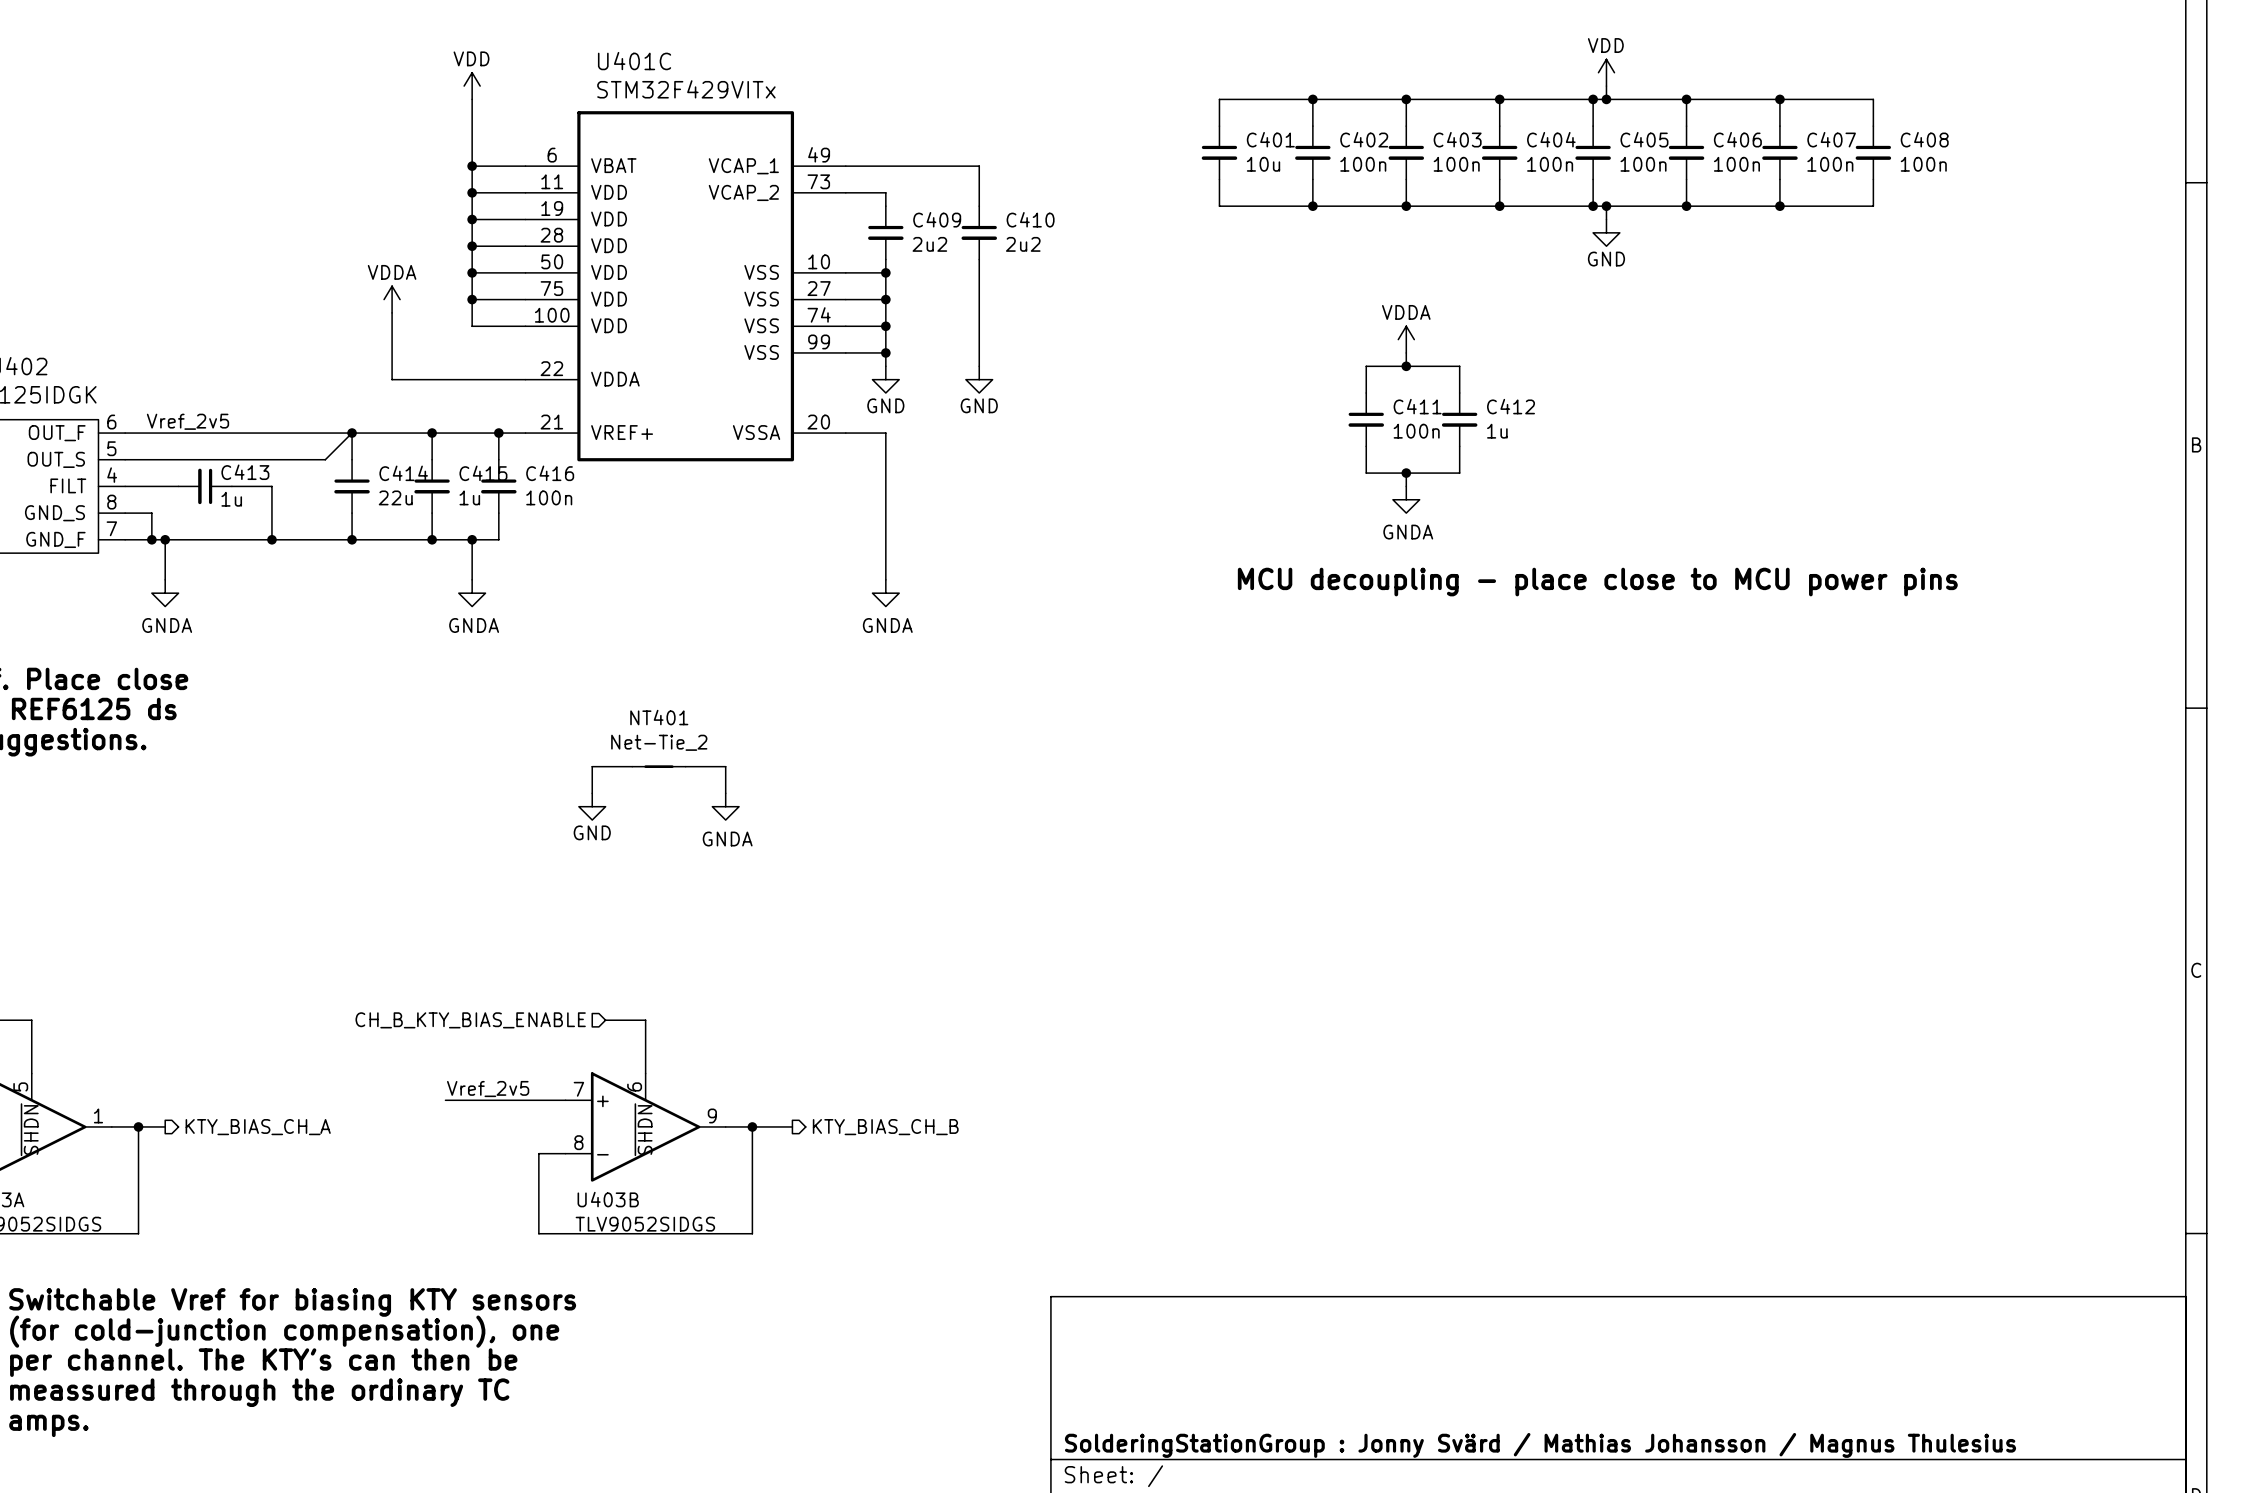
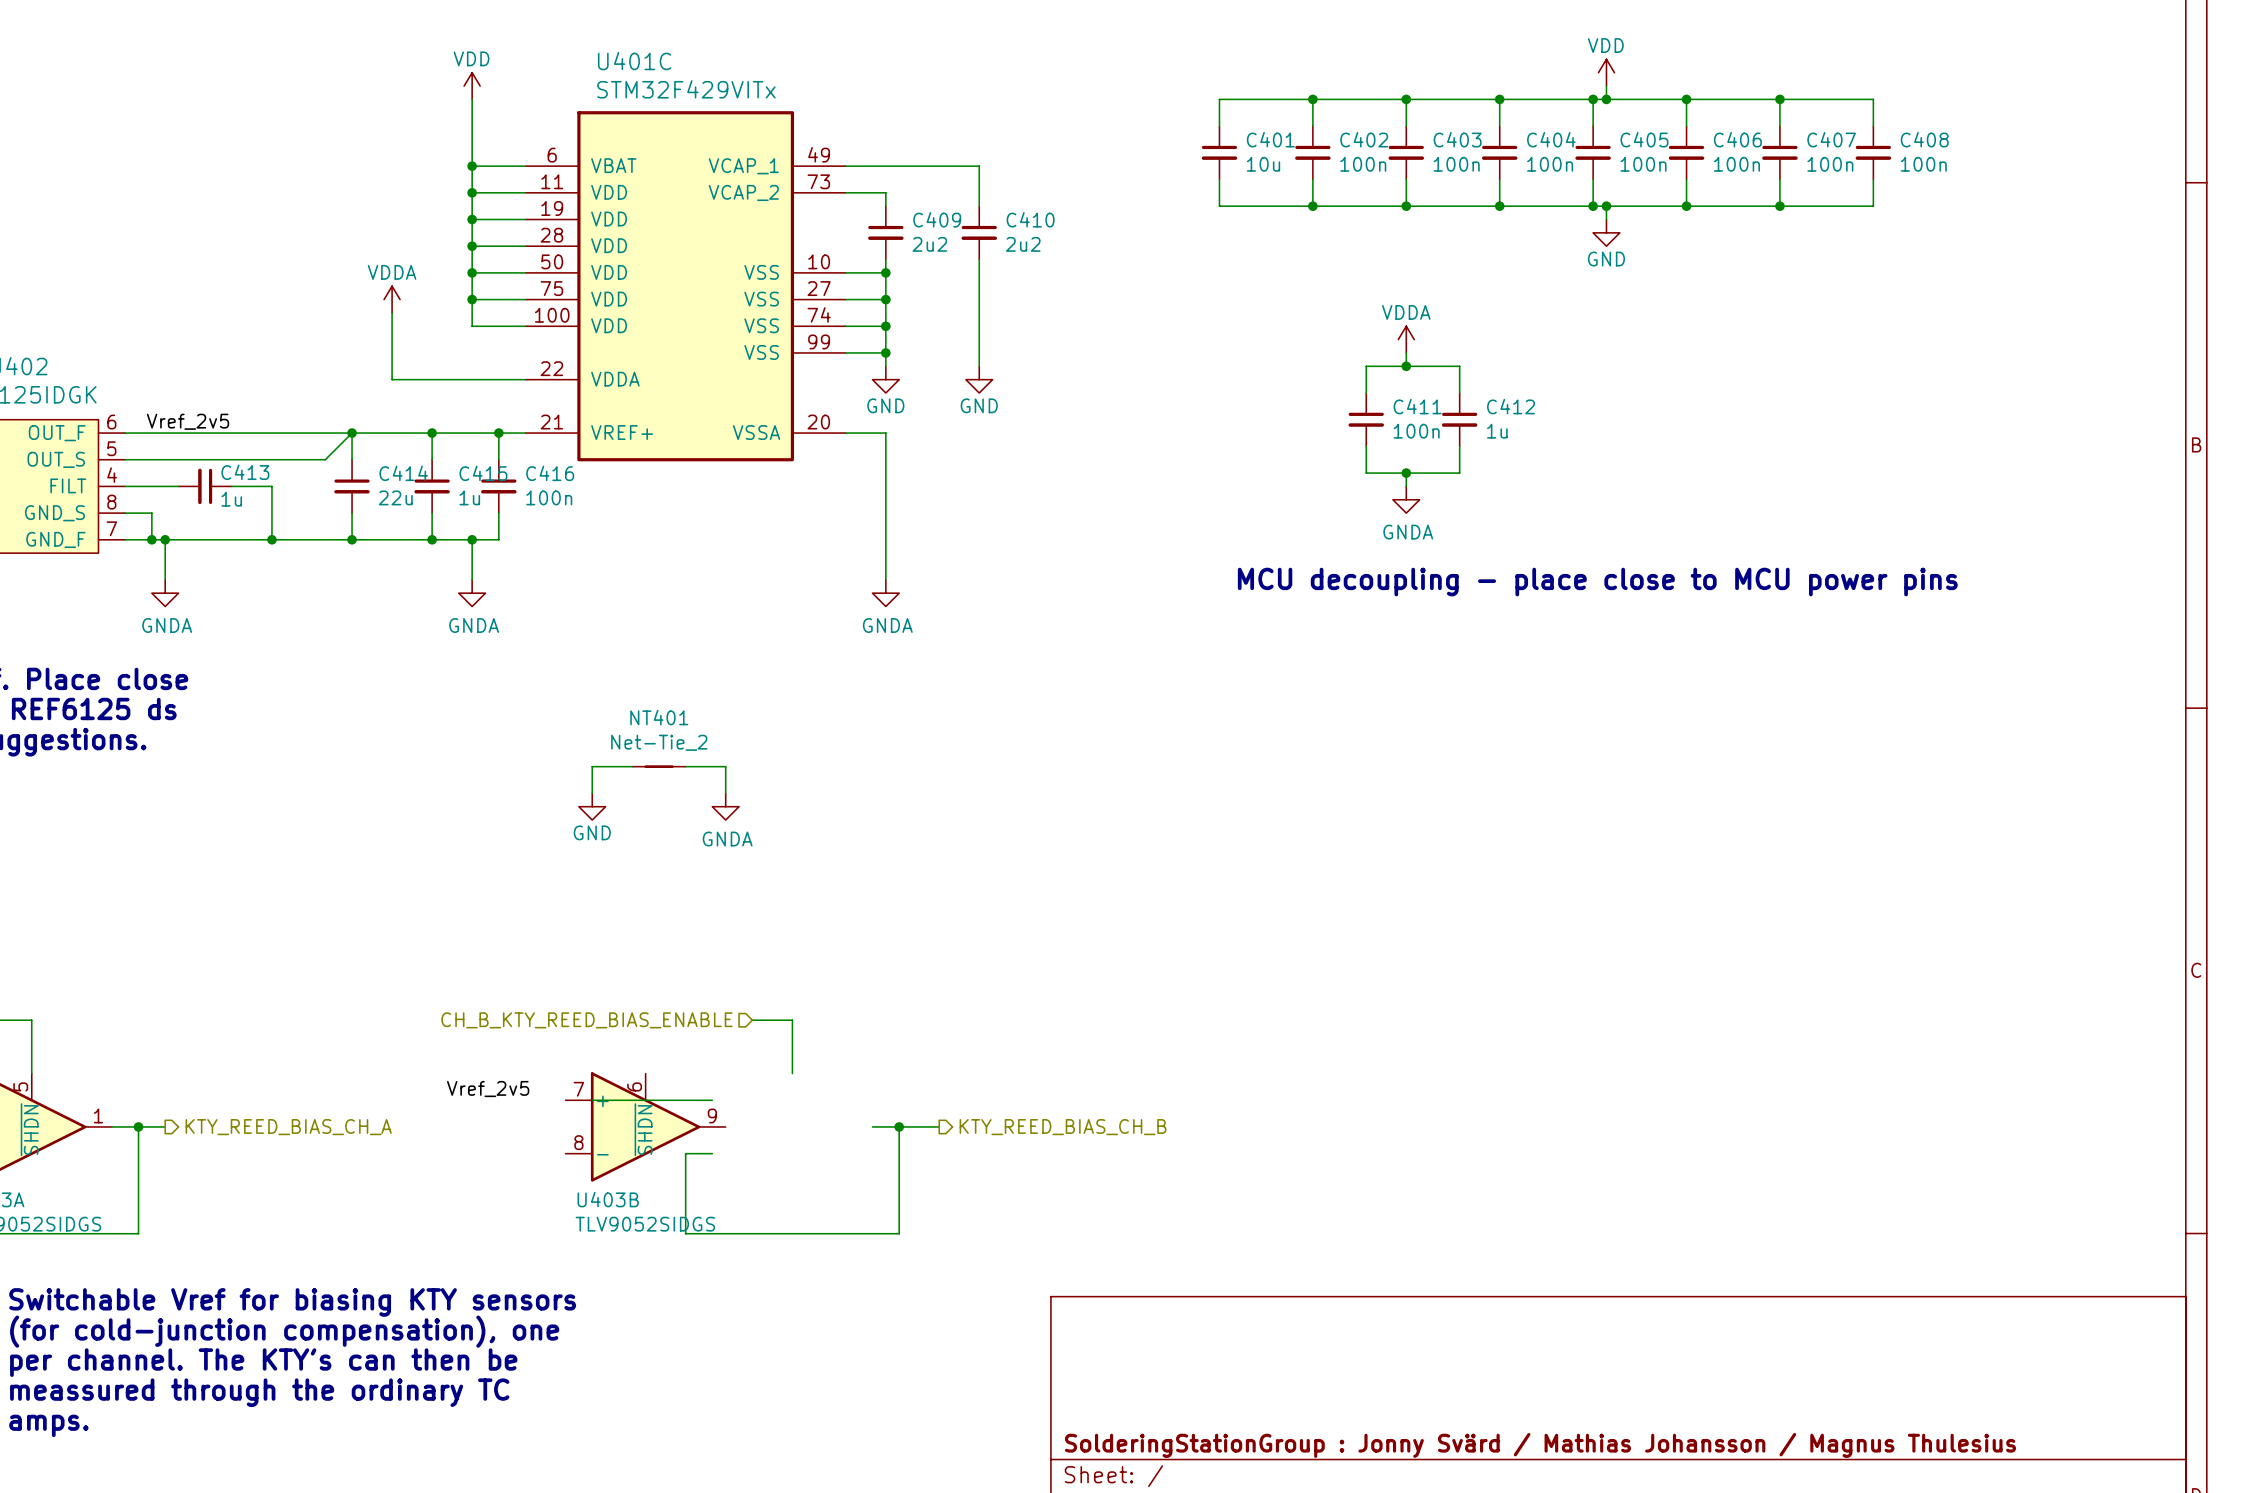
hierarchical label: CH_B_KTY_BIAS_ENABLE (470, 1020) -> CH_B_KTY_REED_BIAS_ENABLE (586, 1020)
wire: (605, 1020) (645, 1020) (645, 1073) -> (752, 1020) (792, 1020) (792, 1073)
wire: (445, 1100) (565, 1100) -> (592, 1100) (712, 1100)
wire: (725, 1126) (792, 1126) -> (872, 1126) (939, 1126)
wire: (752, 1126) (752, 1233) -> (899, 1126) (899, 1233) (752, 1233)
junction: (752, 1126) -> none
junction: none -> (899, 1126)
hierarchical label: KTY_BIAS_CH_A (258, 1127) -> KTY_REED_BIAS_CH_A (288, 1127)
hierarchical label: KTY_BIAS_CH_B (885, 1127) -> KTY_REED_BIAS_CH_B (1063, 1127)
wire: (565, 1153) (538, 1153) (538, 1233) (685, 1233) -> (712, 1153) (685, 1153) (685, 1233)

